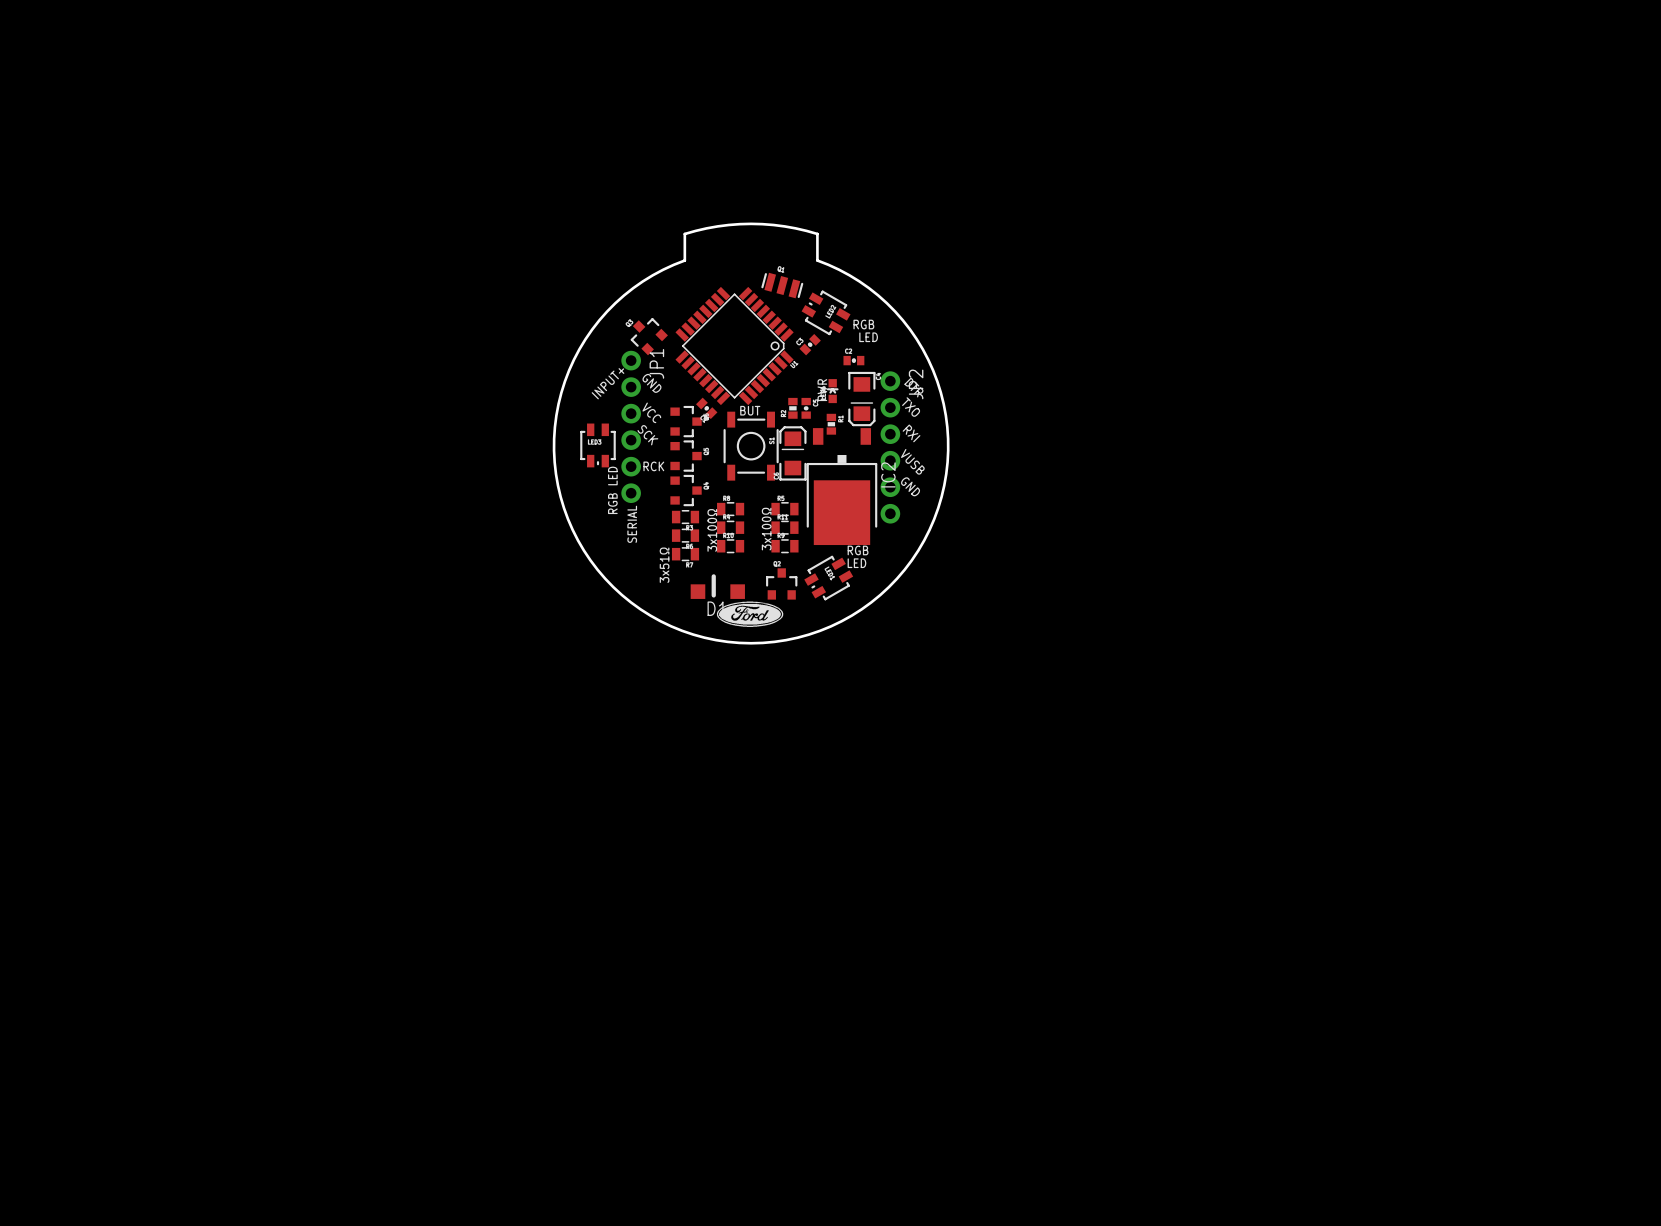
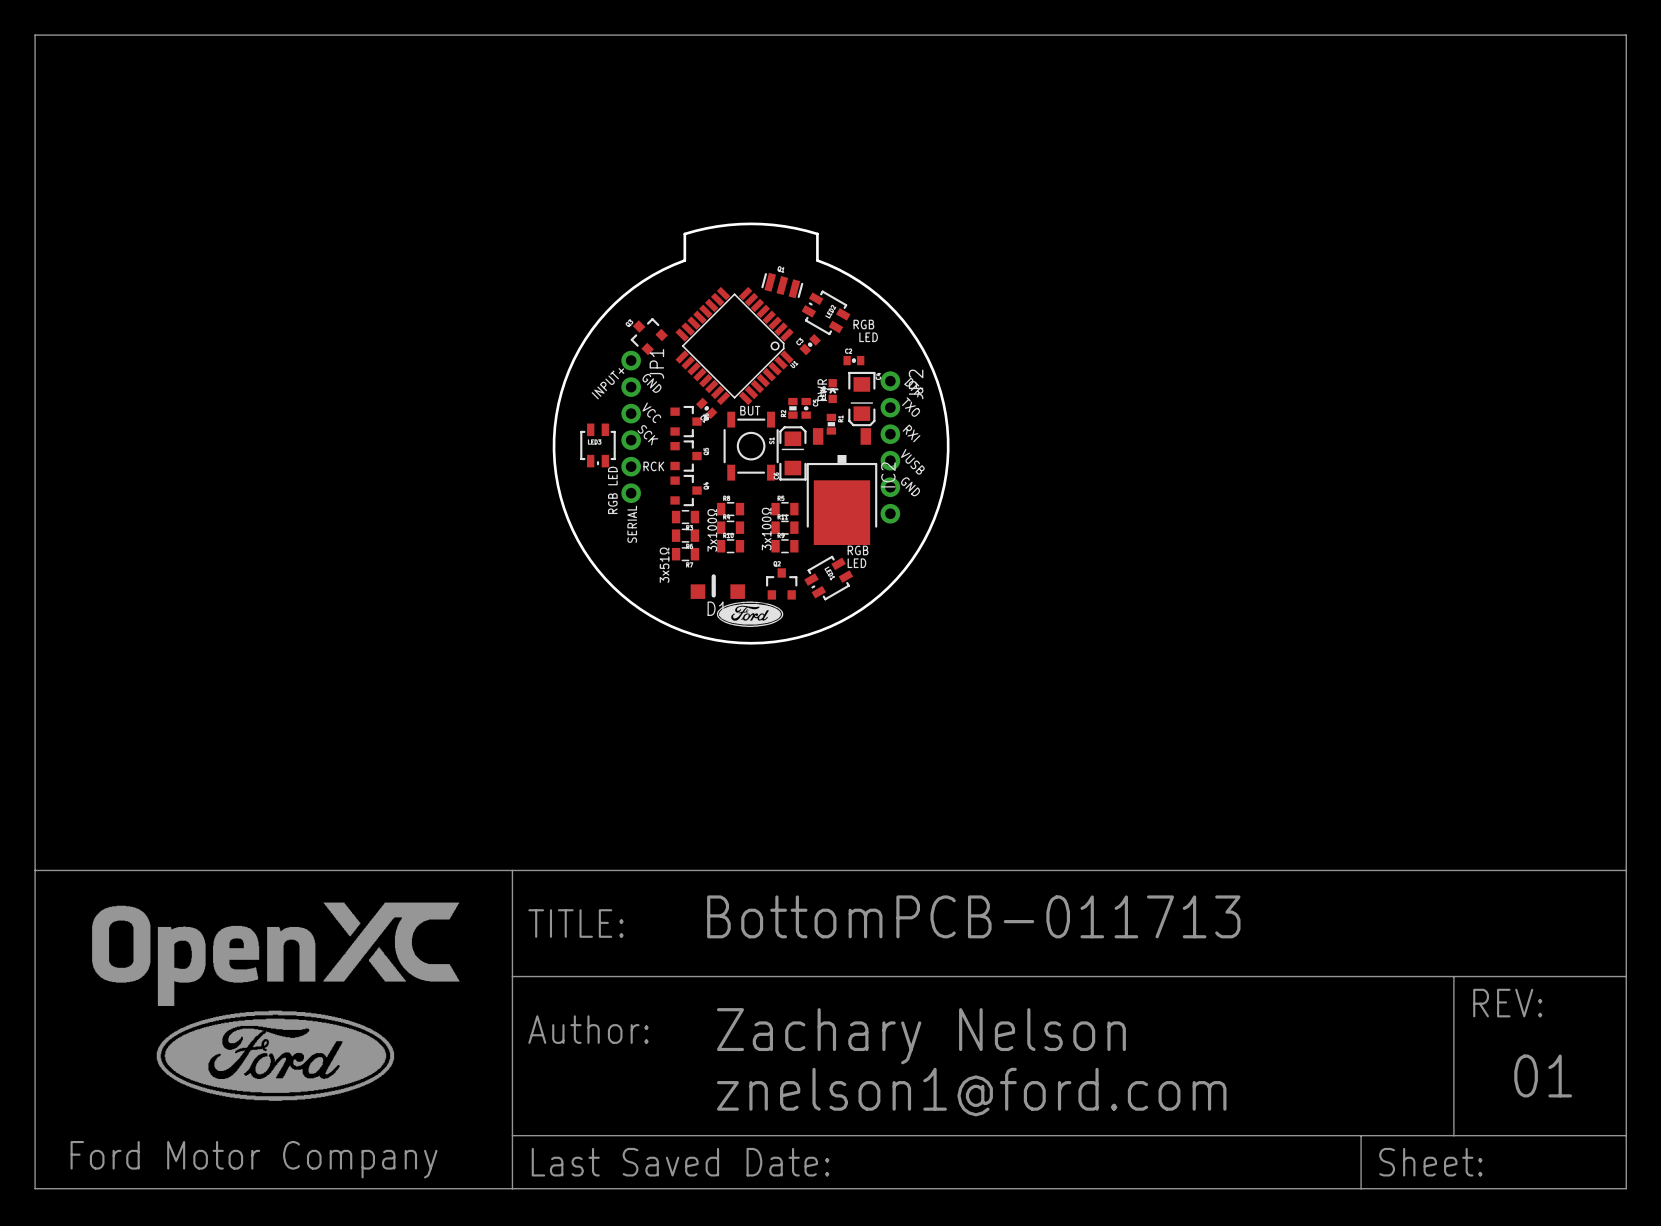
drawing: none -> [34, 869, 1627, 1190]
line: none -> (35, 870) (35, 35) (1626, 35) (1626, 870)
text: none -> Zachary Nelson (921, 1036)
text: none -> 01 (1543, 1075)
text: none -> znelson1@ford.com (971, 1092)

